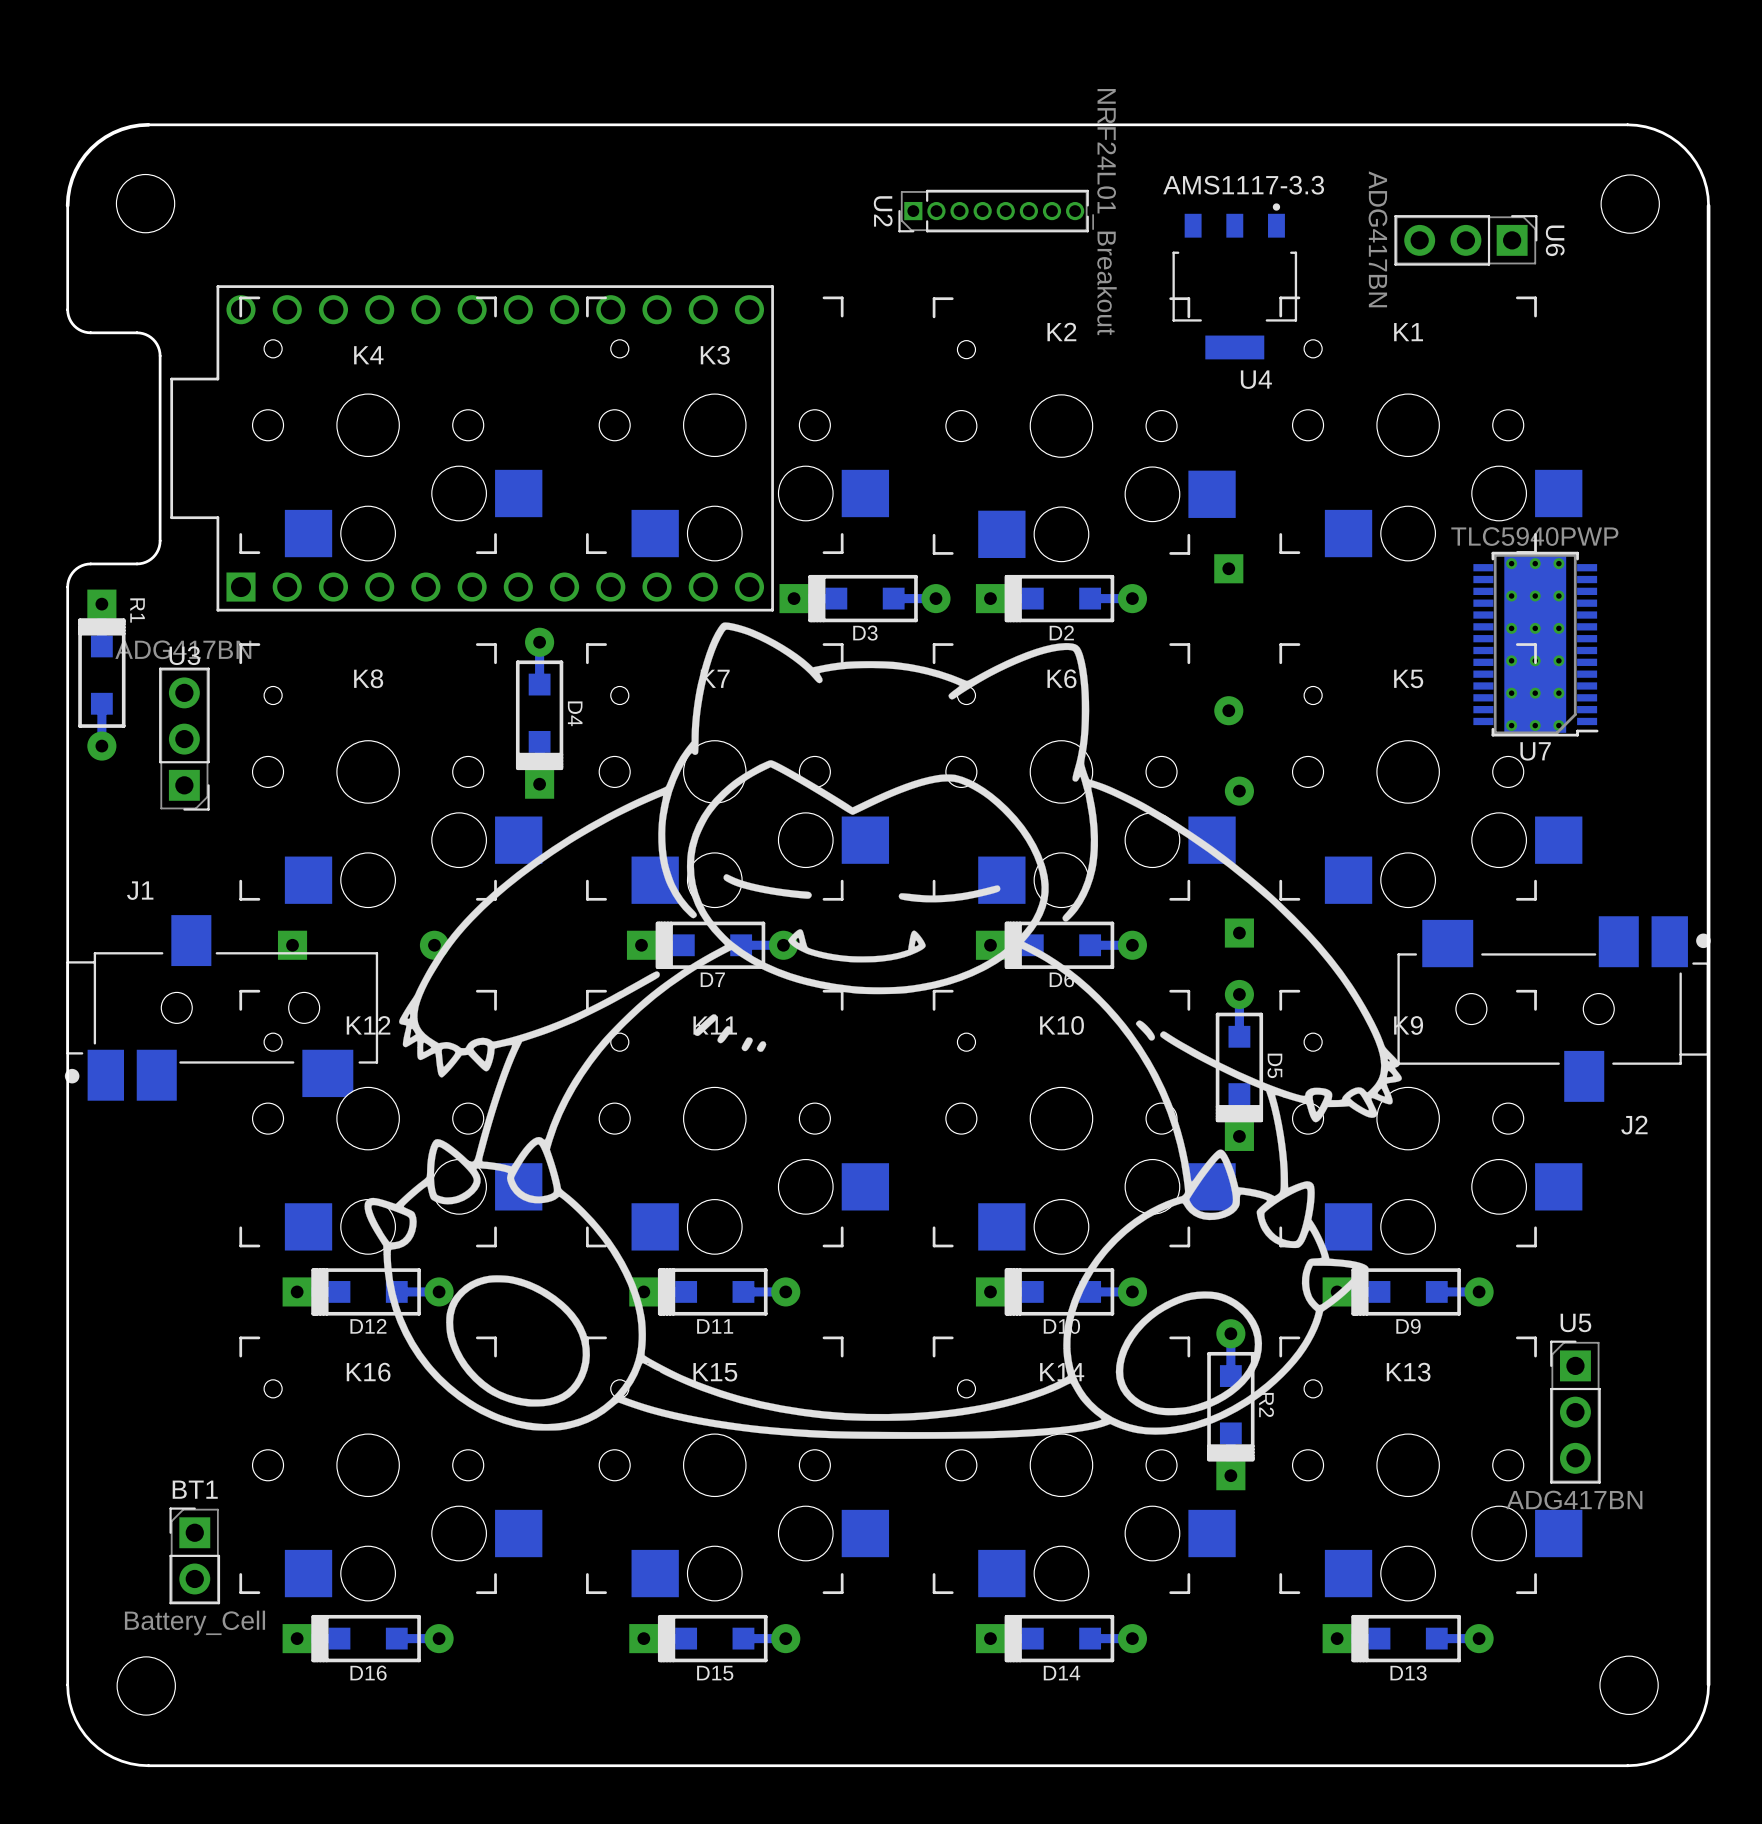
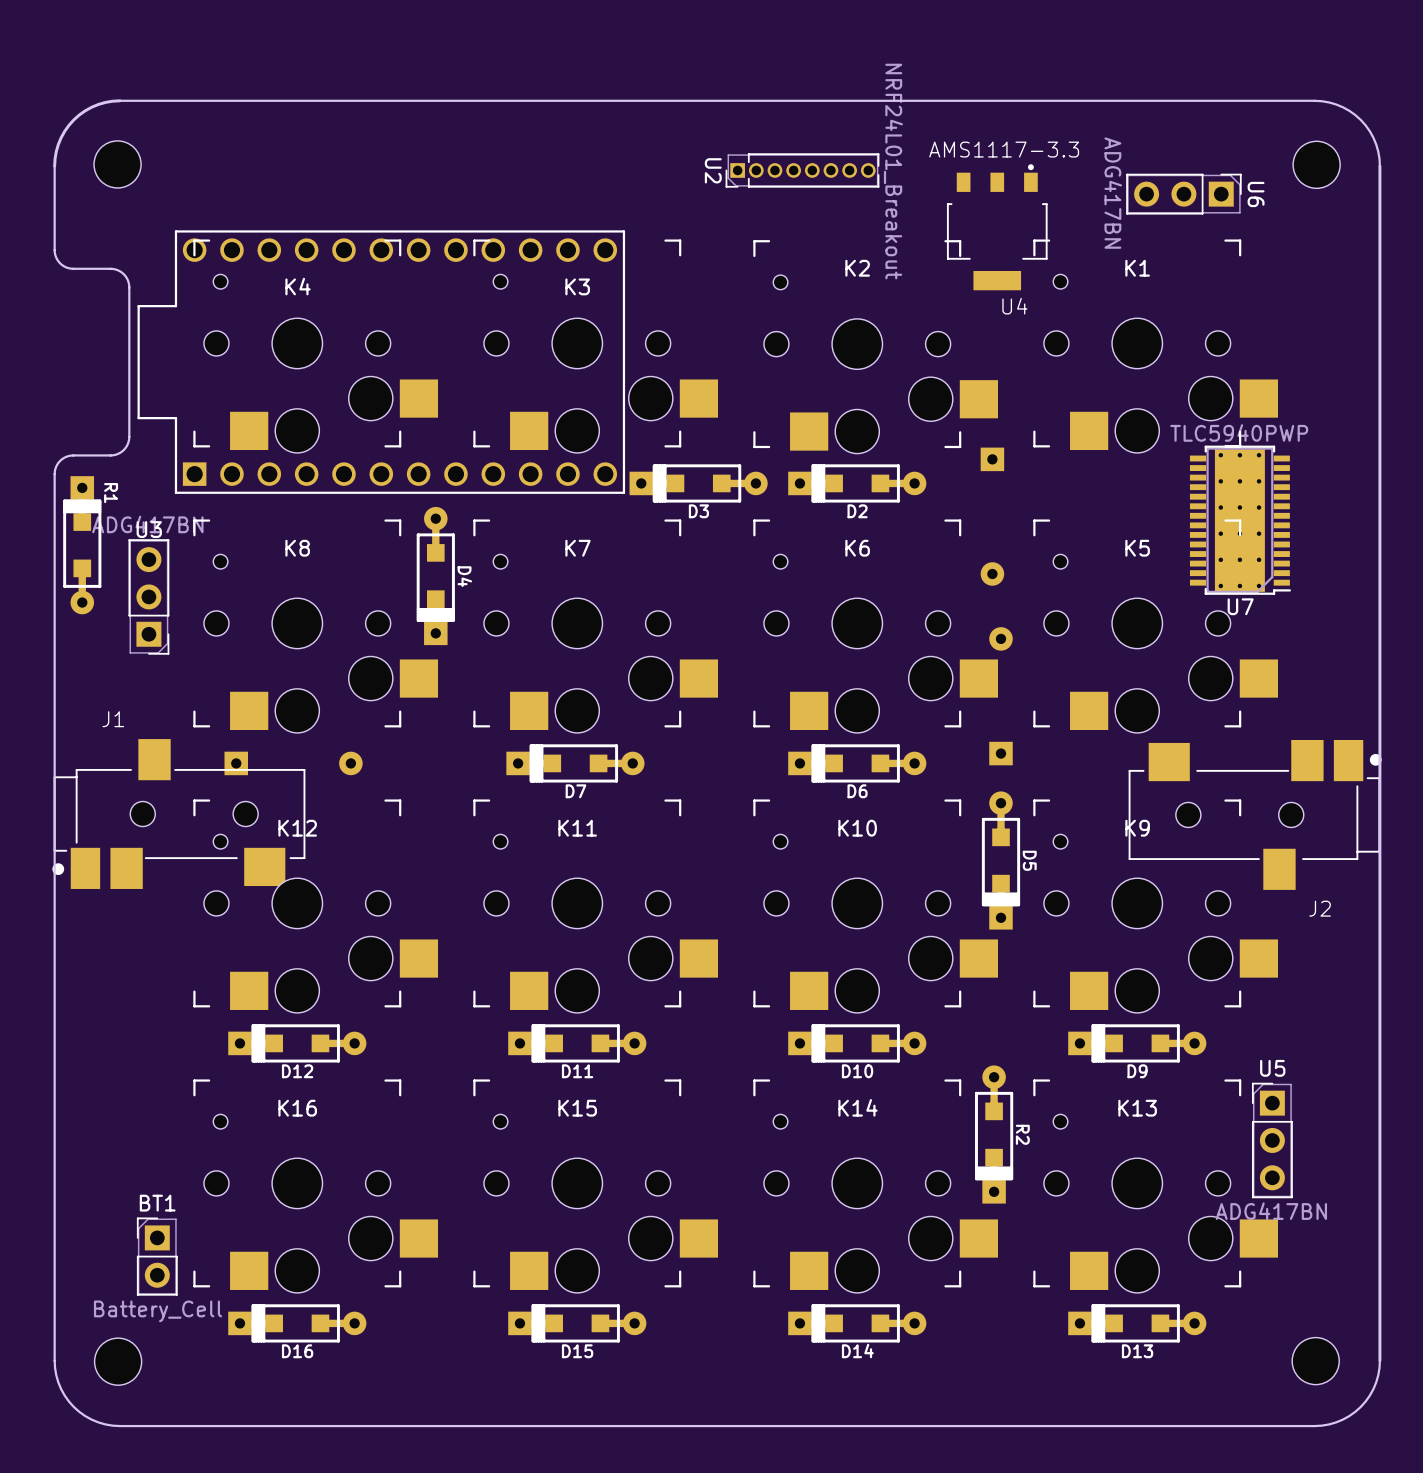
drawing: [364, 622, 1402, 1439] -> none

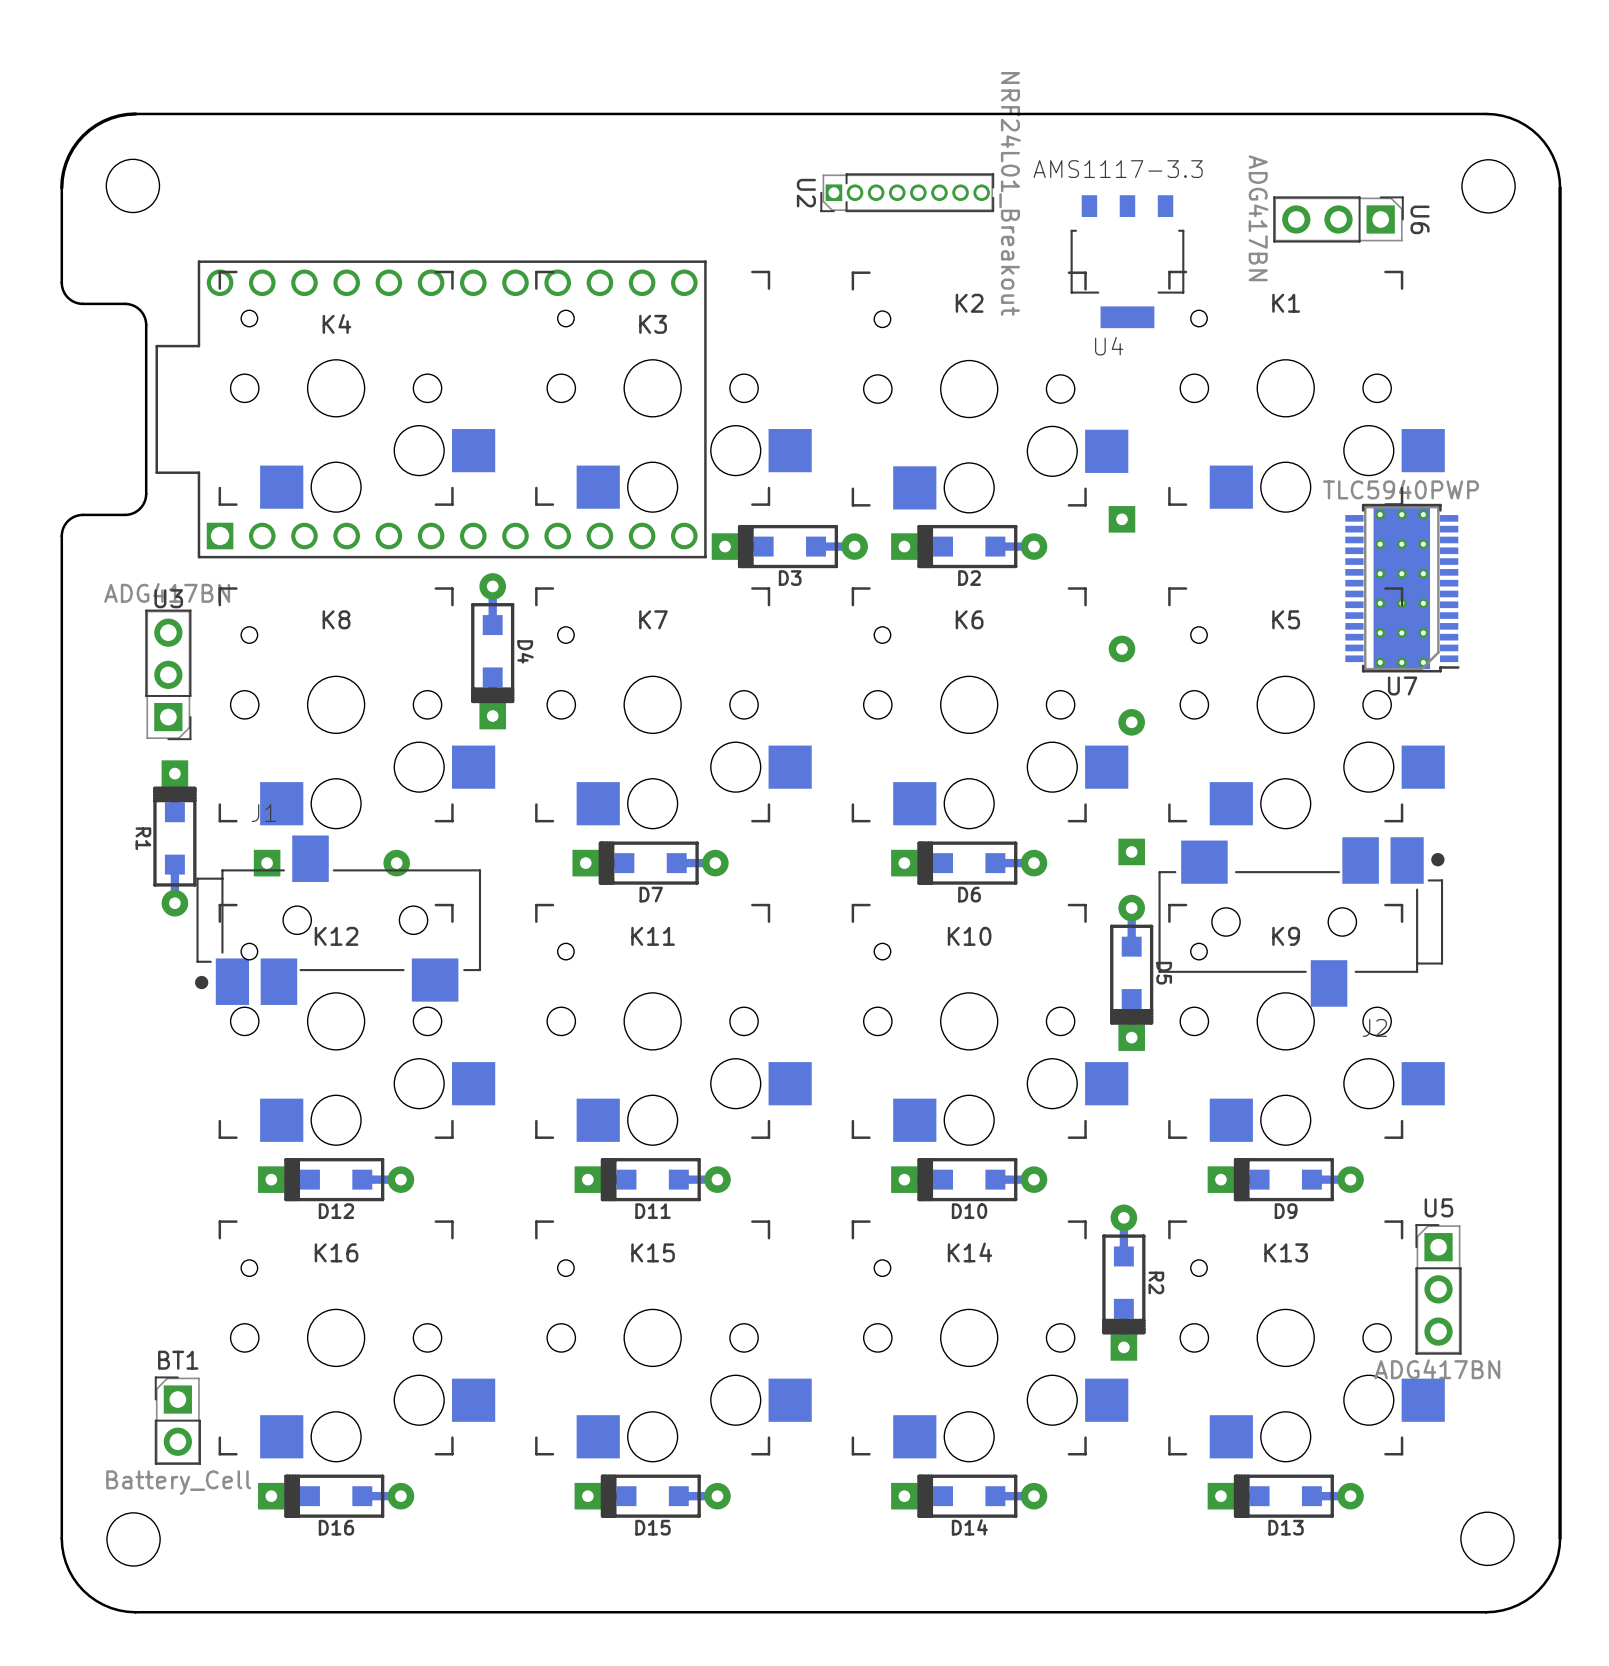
U4 side: bottom (997, 227) -> top (1127, 261)
R1 name position: R1 (111, 493) -> R1 (143, 838)
R1 position: (82, 545) -> (174, 838)
J1 position: (178, 814) -> (338, 920)
J2 position: (1255, 814) -> (1301, 921)

